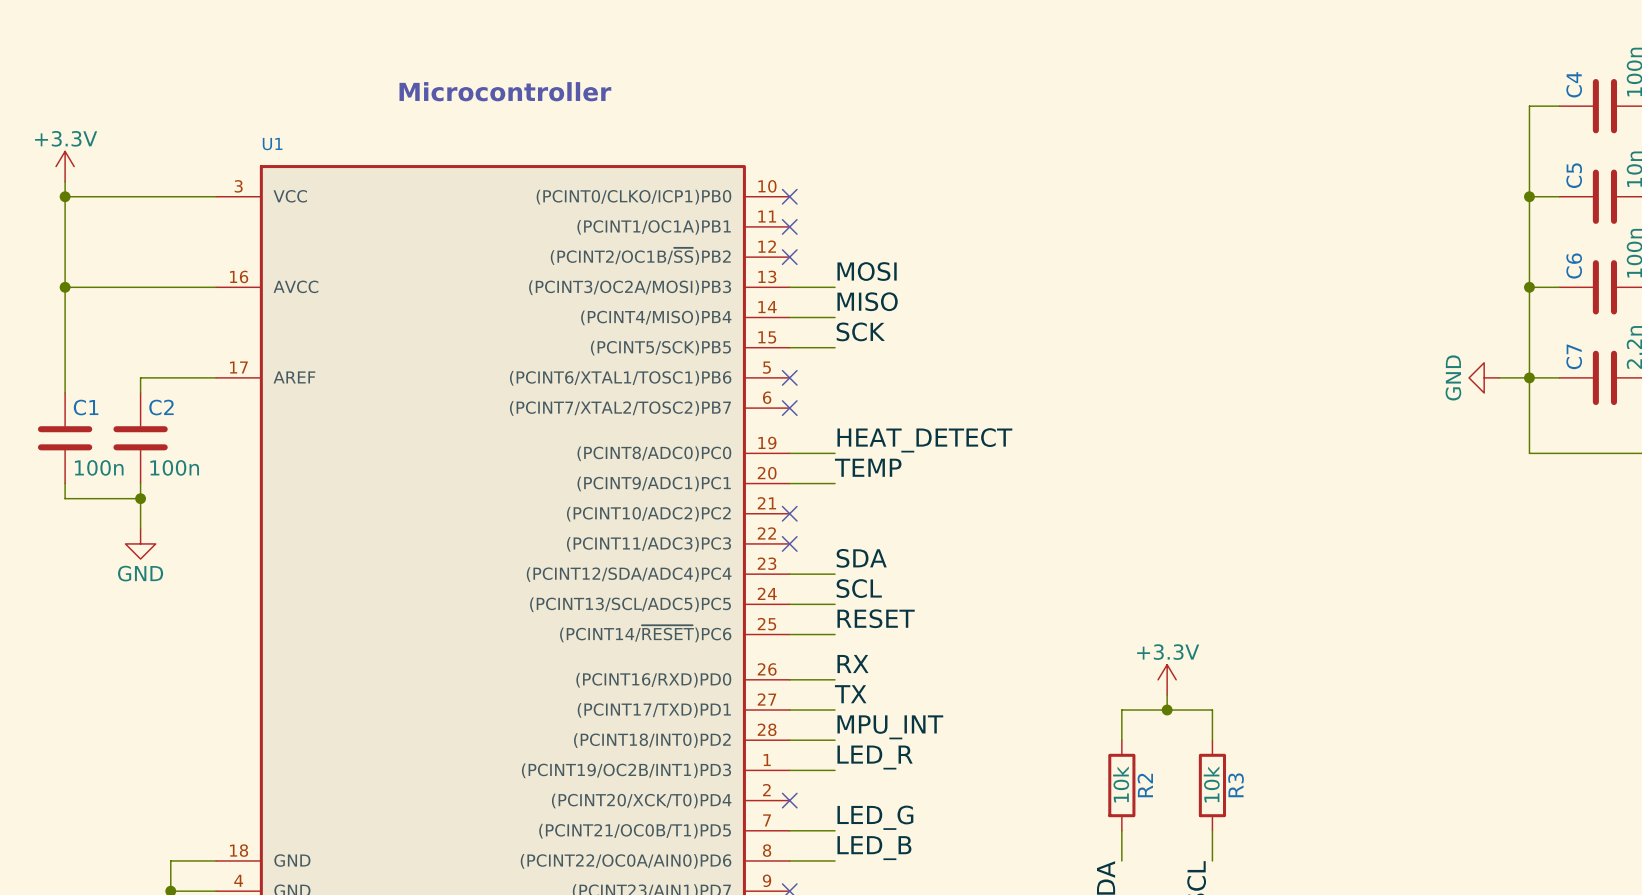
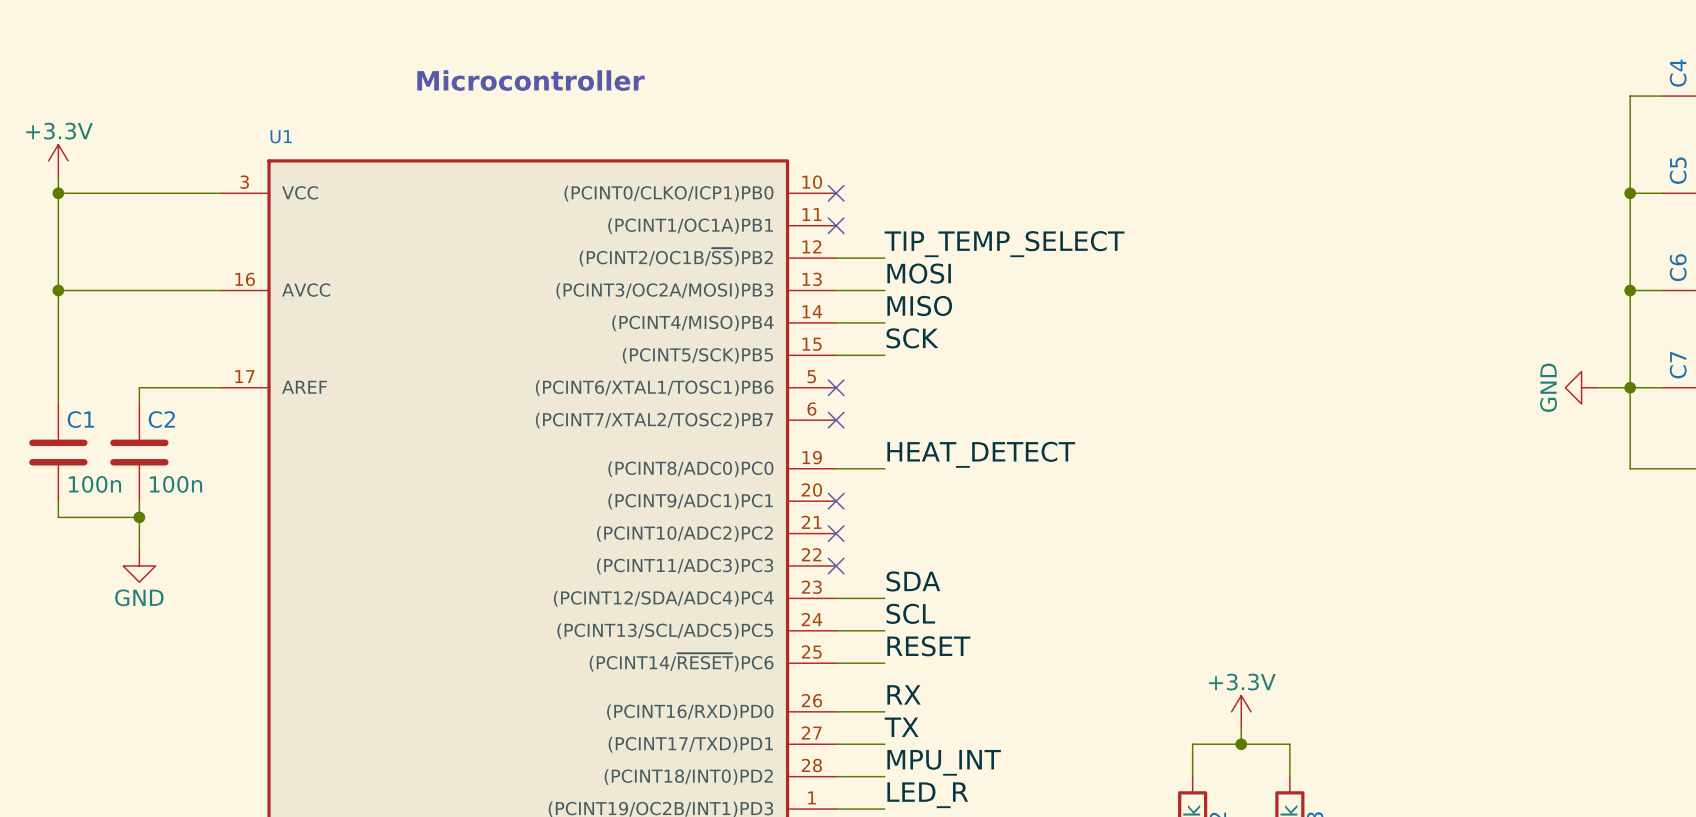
label: none -> TIP_TEMP_SELECT (1004, 244)
no-connect mark: (789, 257) -> none
label: TEMP (868, 467) -> none
wire: (789, 483) (835, 483) -> (836, 258) (884, 258)
no-connect mark: none -> (836, 501)

